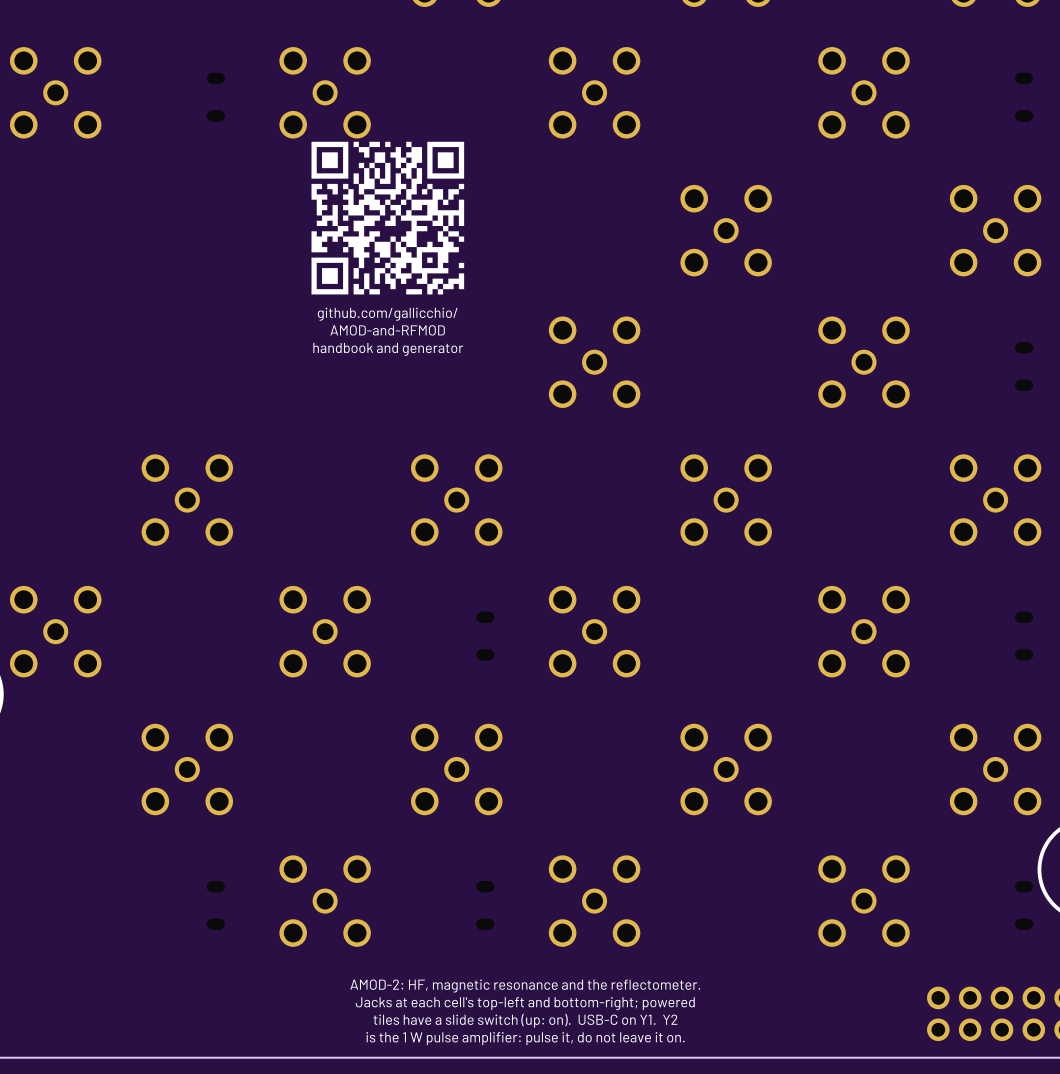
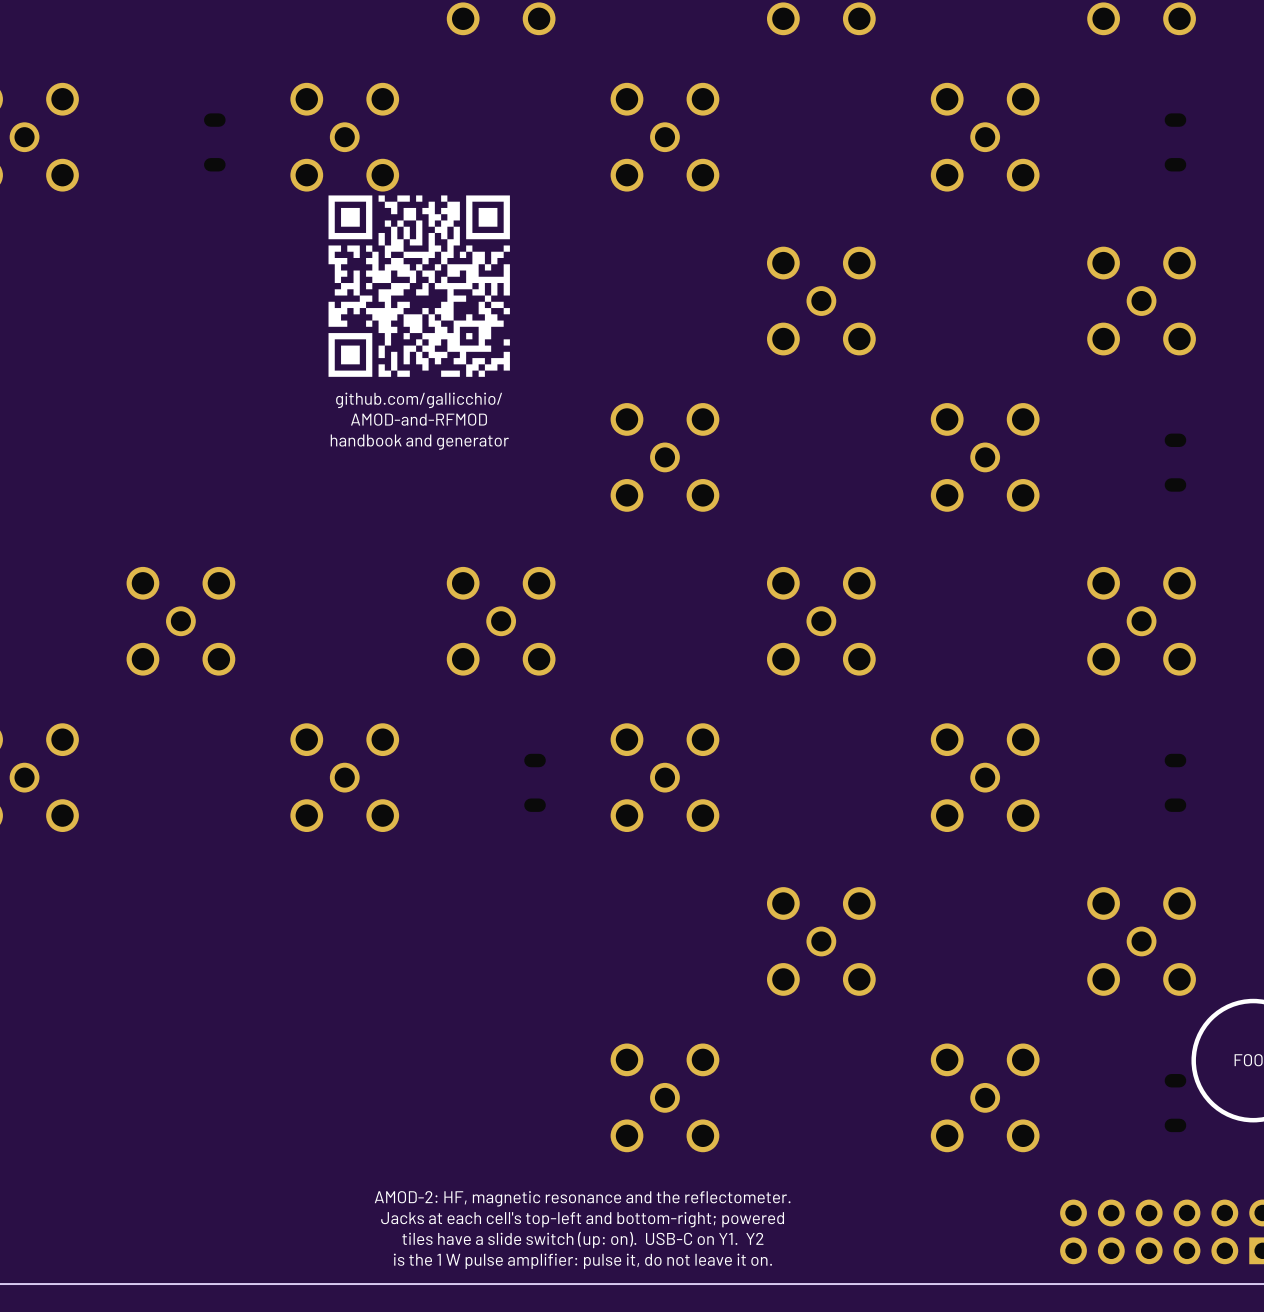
part: (187, 769) -> none
part: (456, 769) -> none
part: (325, 901) -> none
part: (215, 905) -> none
part: (485, 905) -> none

